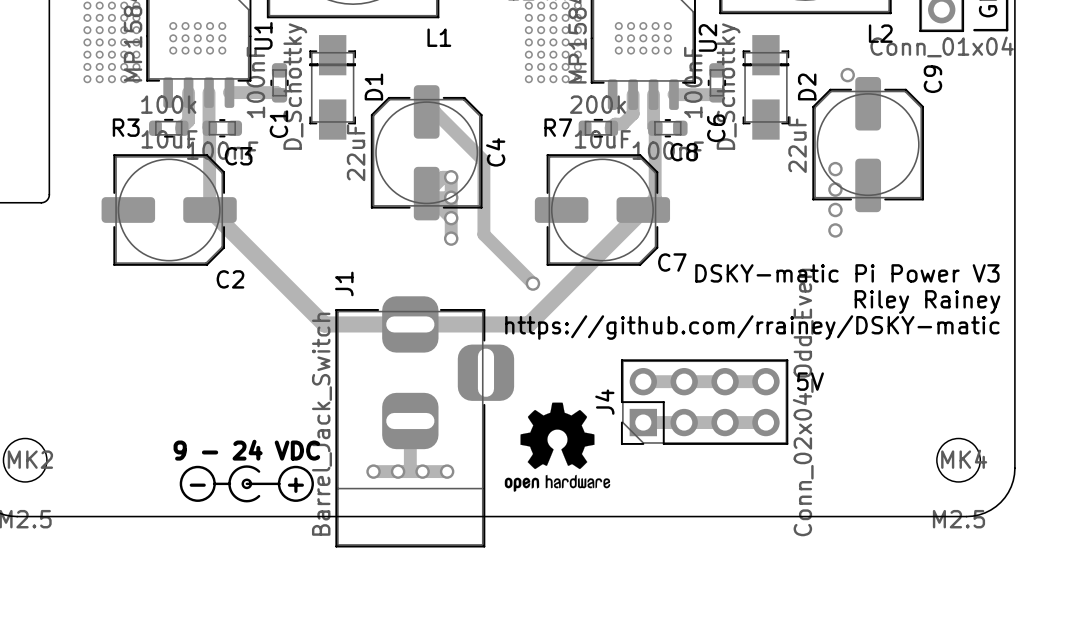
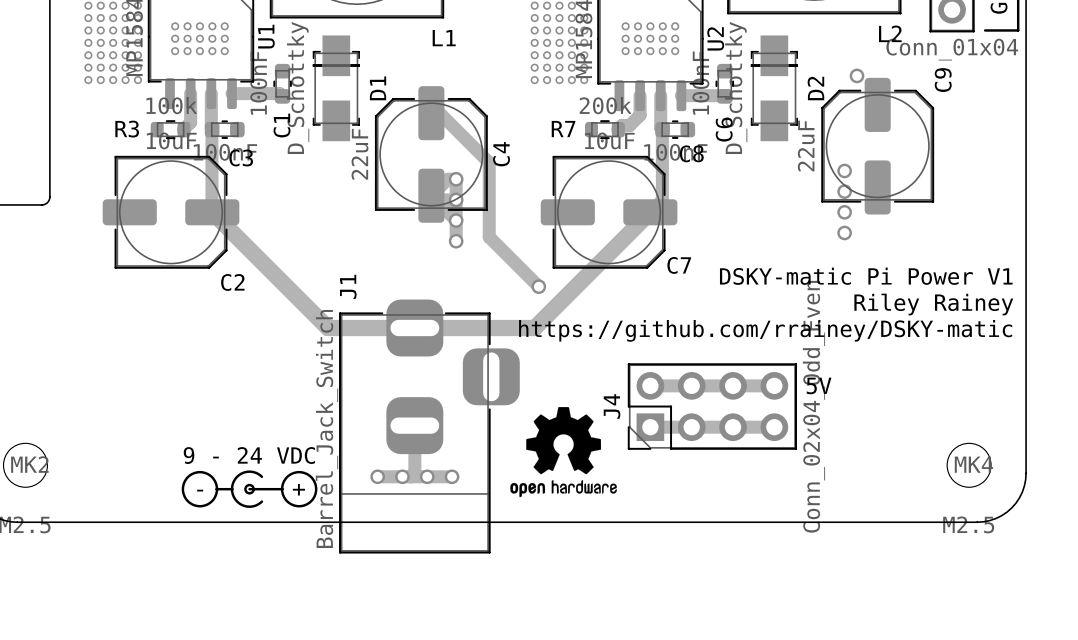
text: DSKY-matic Pi Power V3 (847, 273) -> DSKY-matic Pi Power V1 (866, 276)

